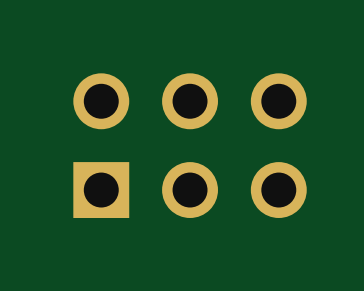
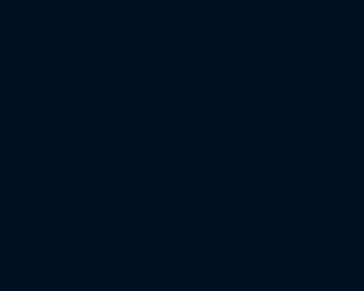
part: (190, 145) -> none

